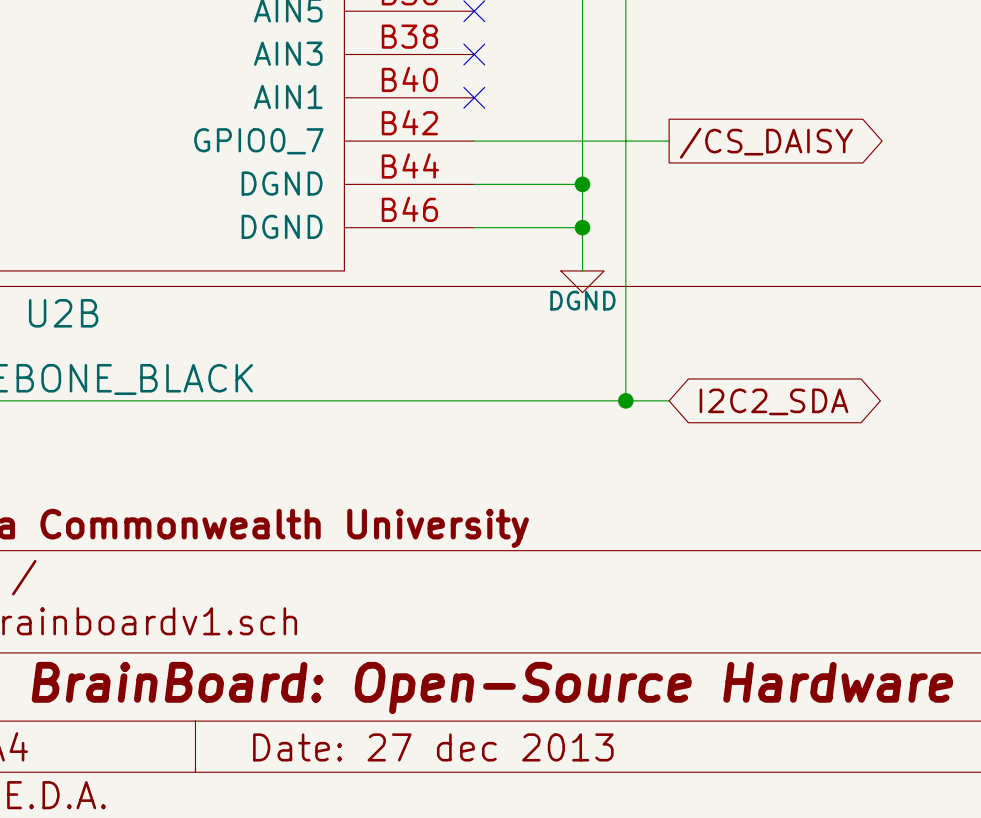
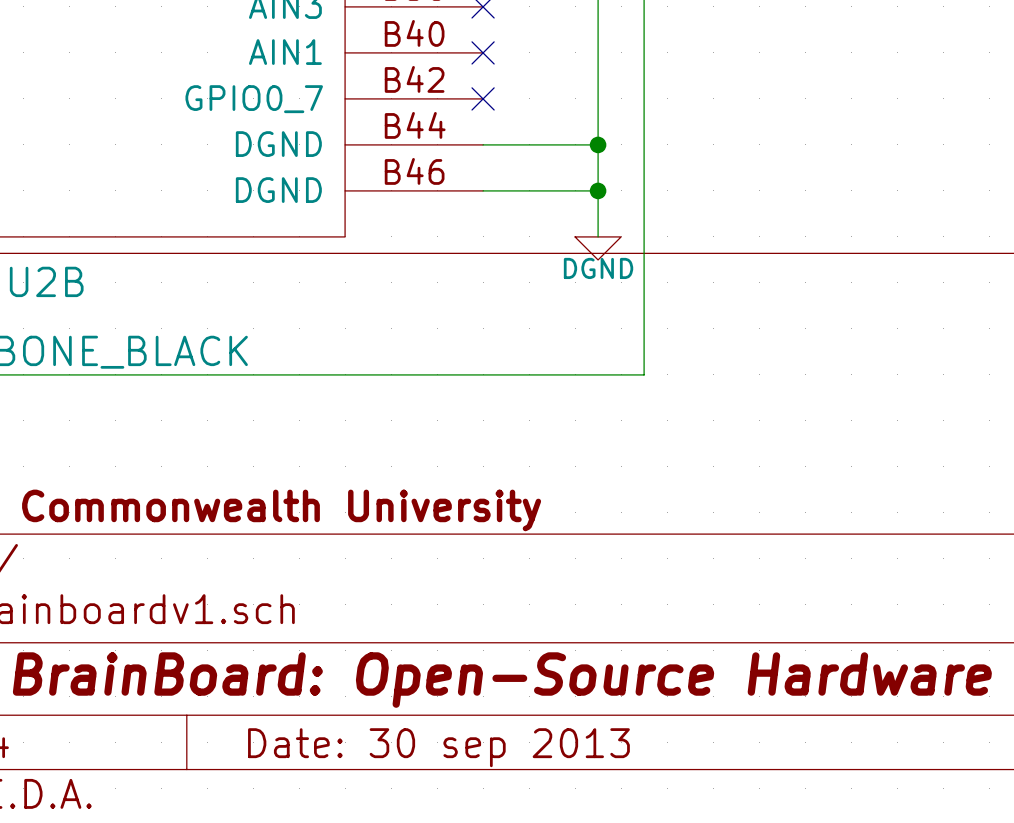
wire: (474, 141) (669, 141) -> none
no-connect mark: none -> (483, 98)
global label: /CS_DAISY (766, 143) -> none
wire: (625, 400) (669, 400) -> none
junction: (625, 400) -> none
global label: I2C2_SDA (774, 401) -> none
title block: Date: 27 dec 2013 (433, 747) -> Date: 30 sep 2013 (438, 747)

